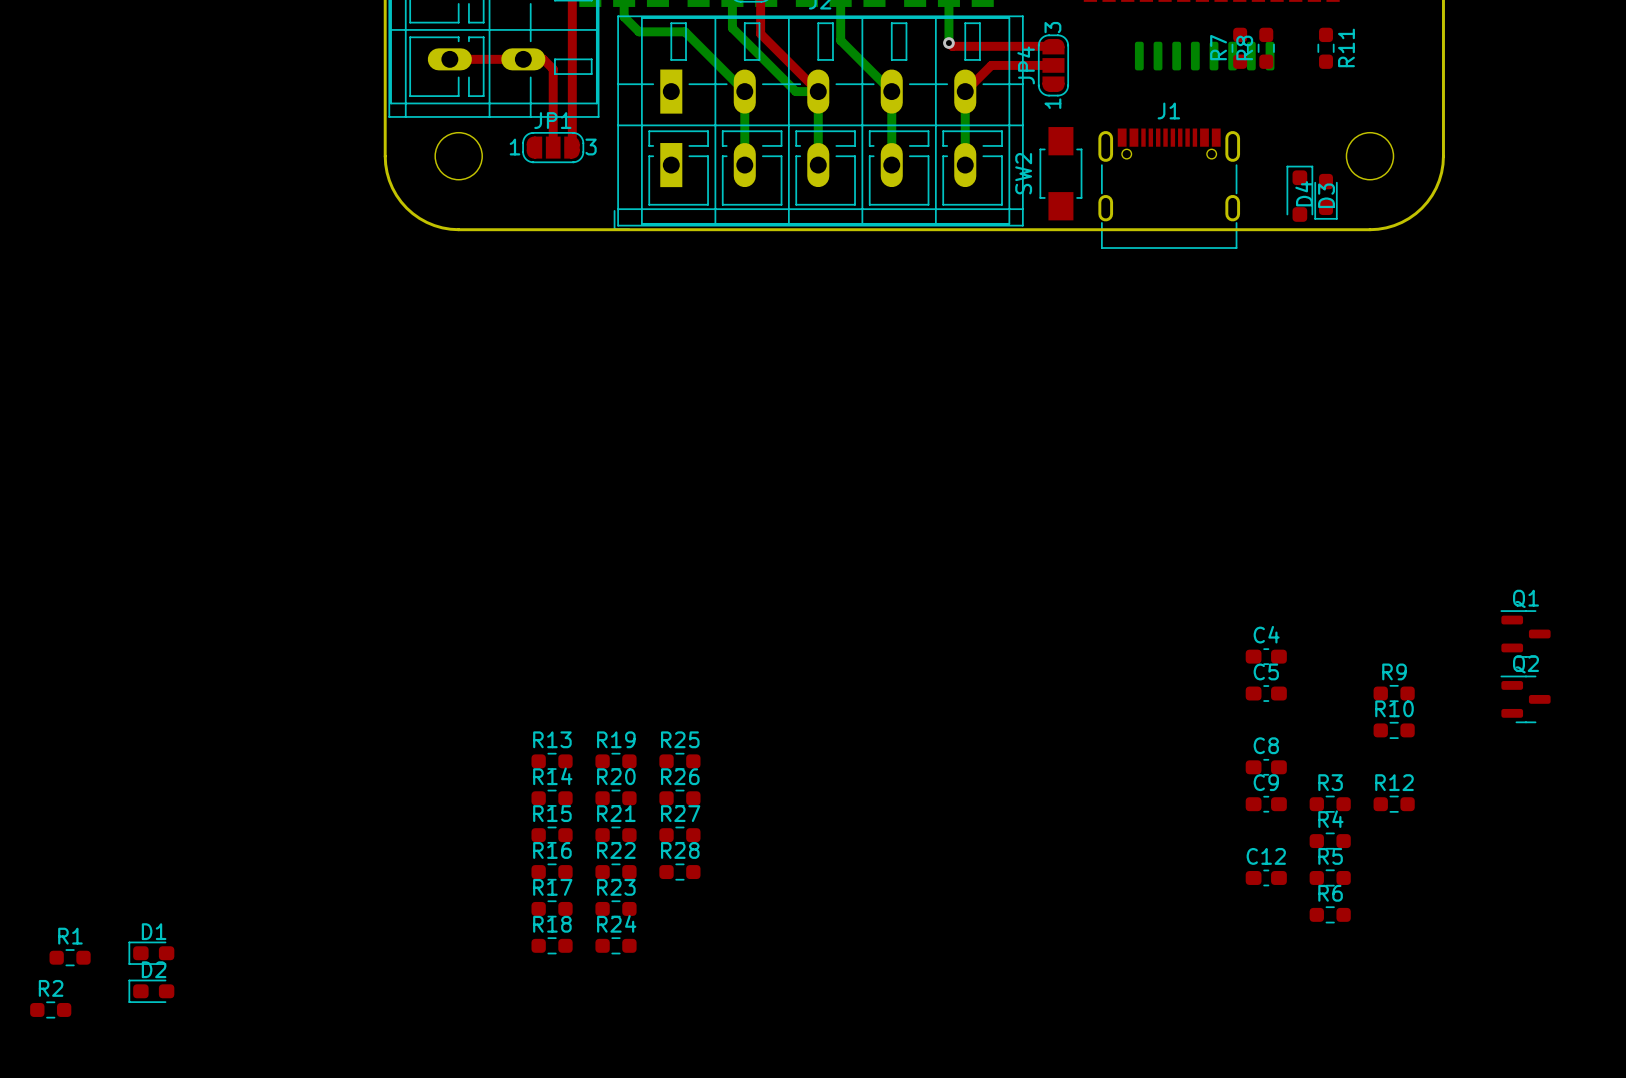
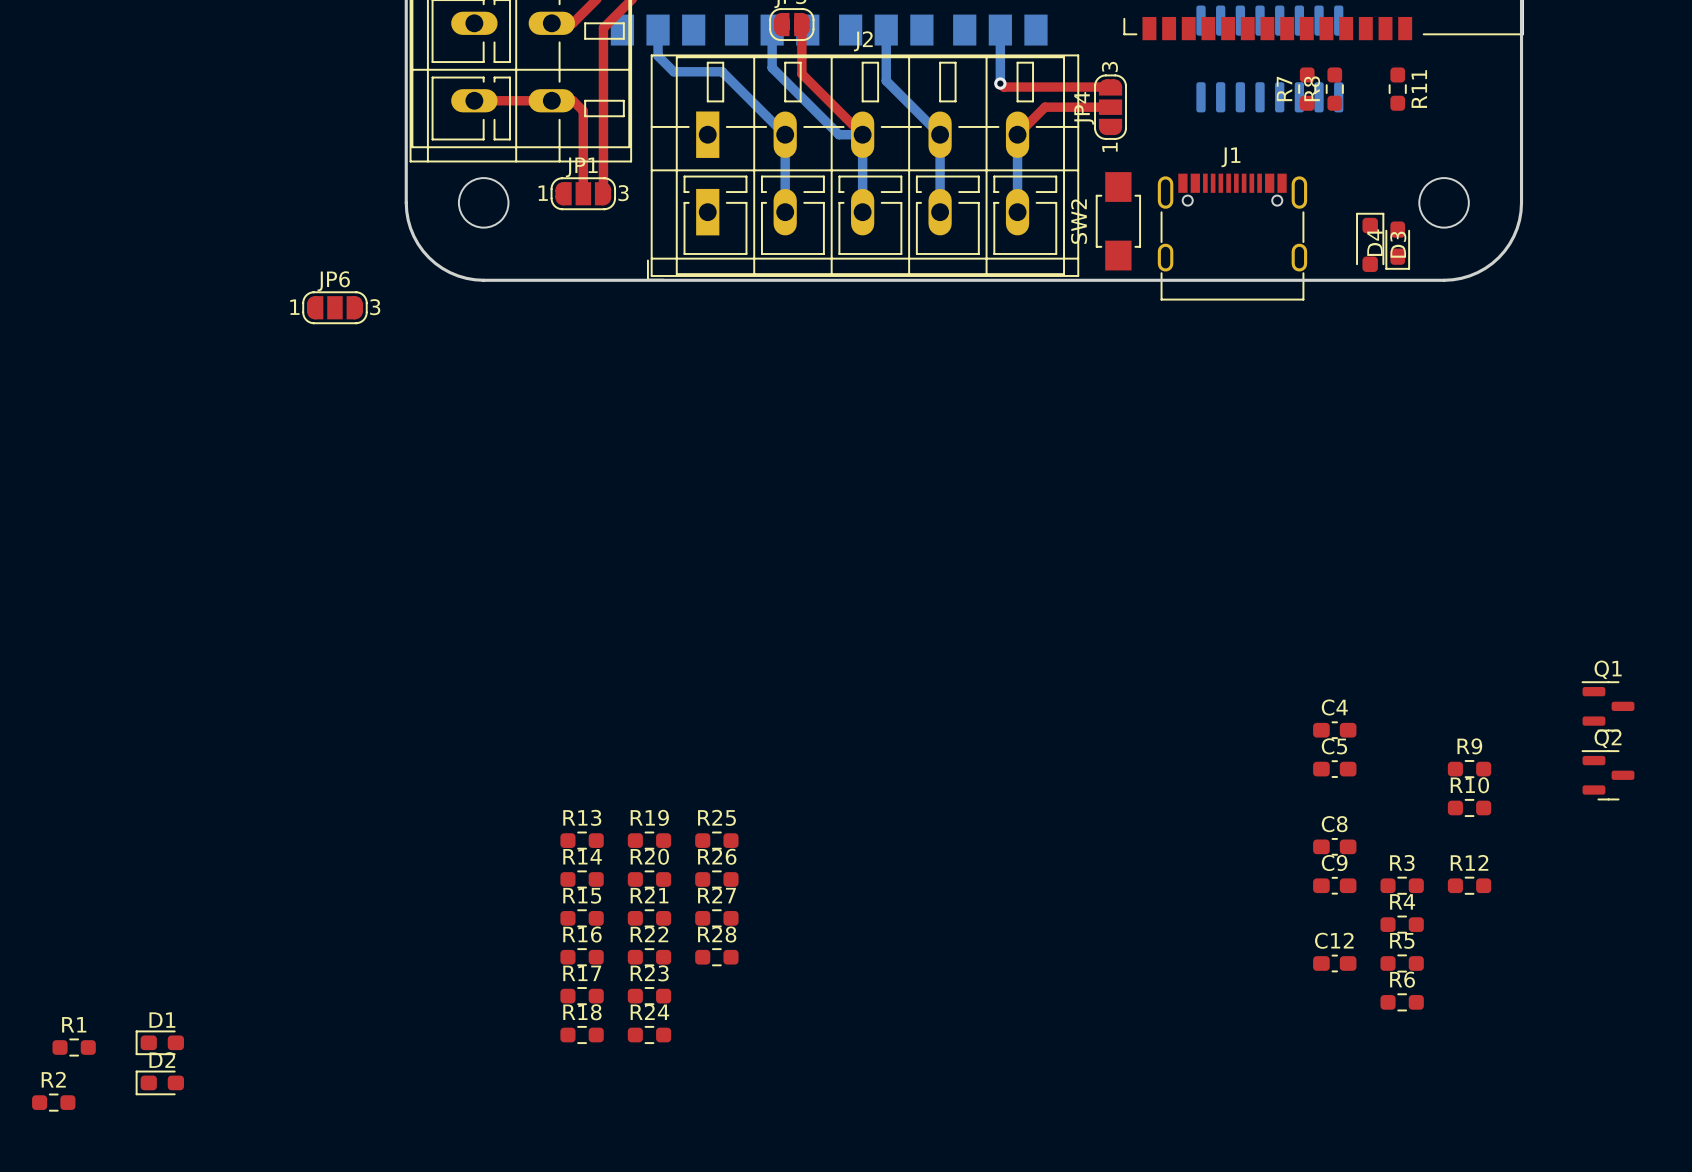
JP6: none -> (334, 307)

